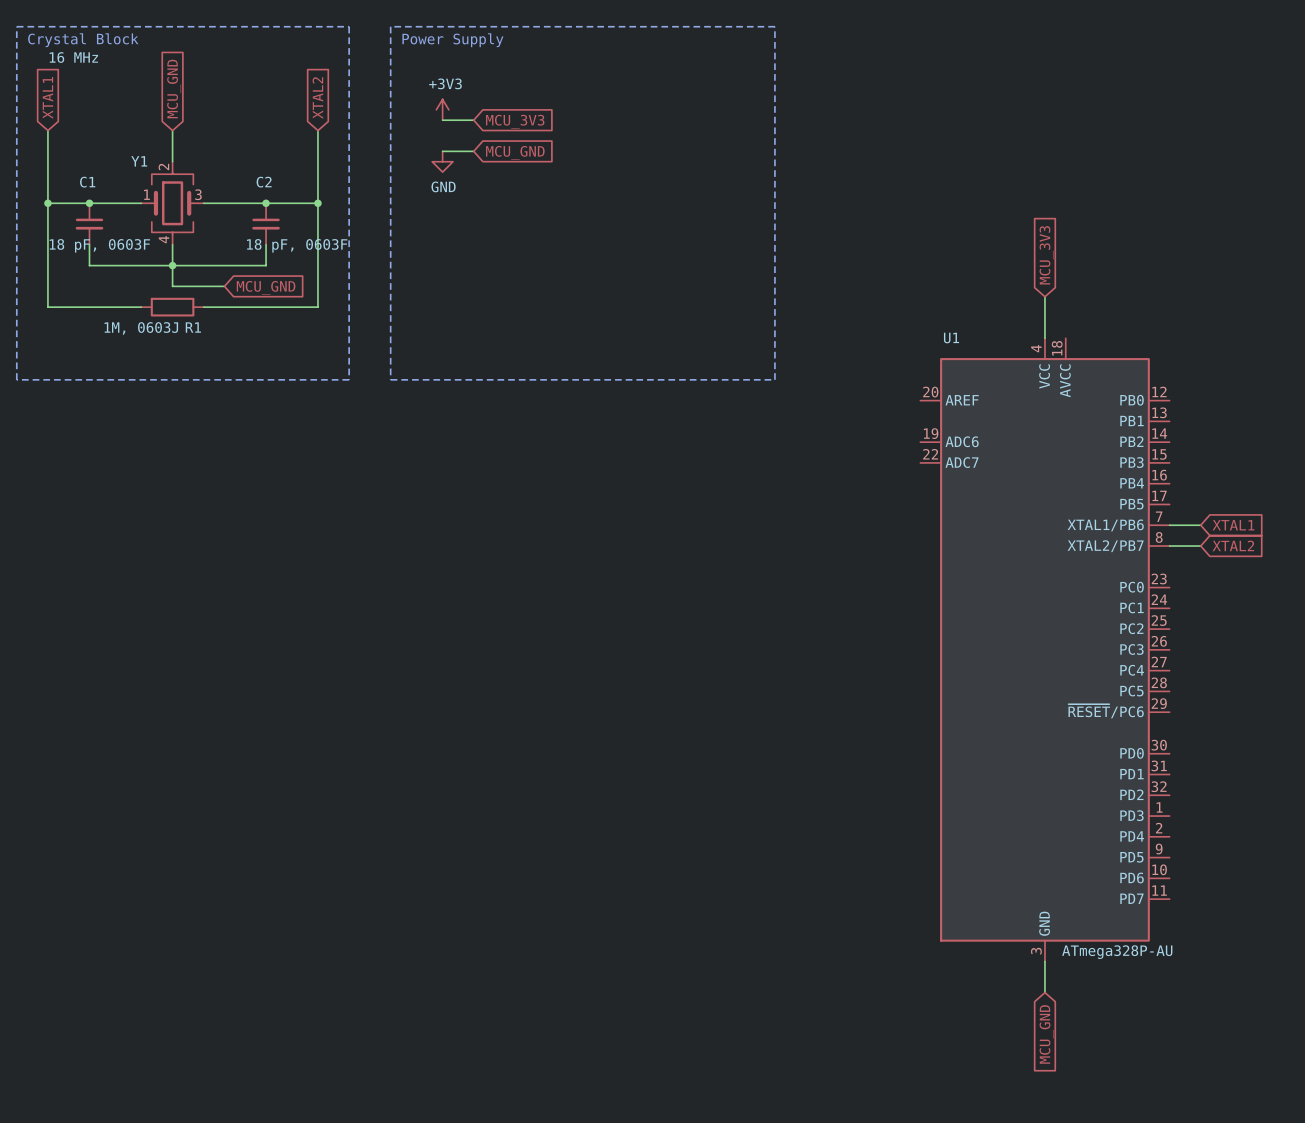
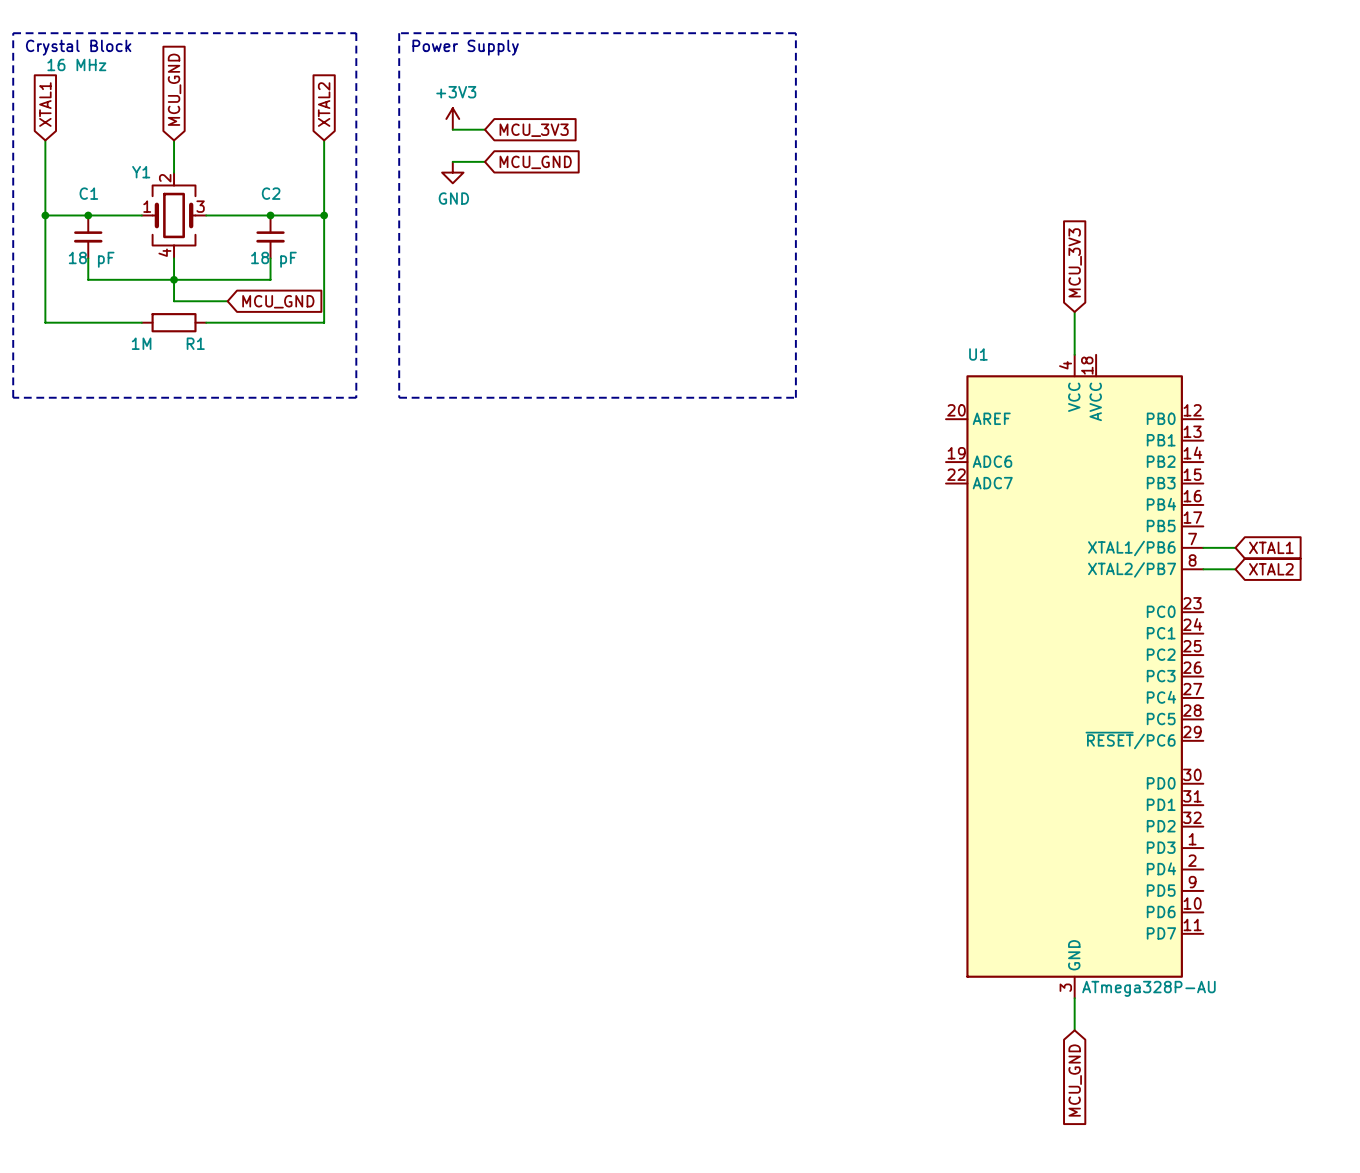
C1 value: 18 pF, 0603F (99, 245) -> 18 pF (91, 259)
C2 value: 18 pF, 0603F (297, 245) -> 18 pF (273, 259)
R1 value: 1M, 0603J (141, 328) -> 1M (141, 343)

